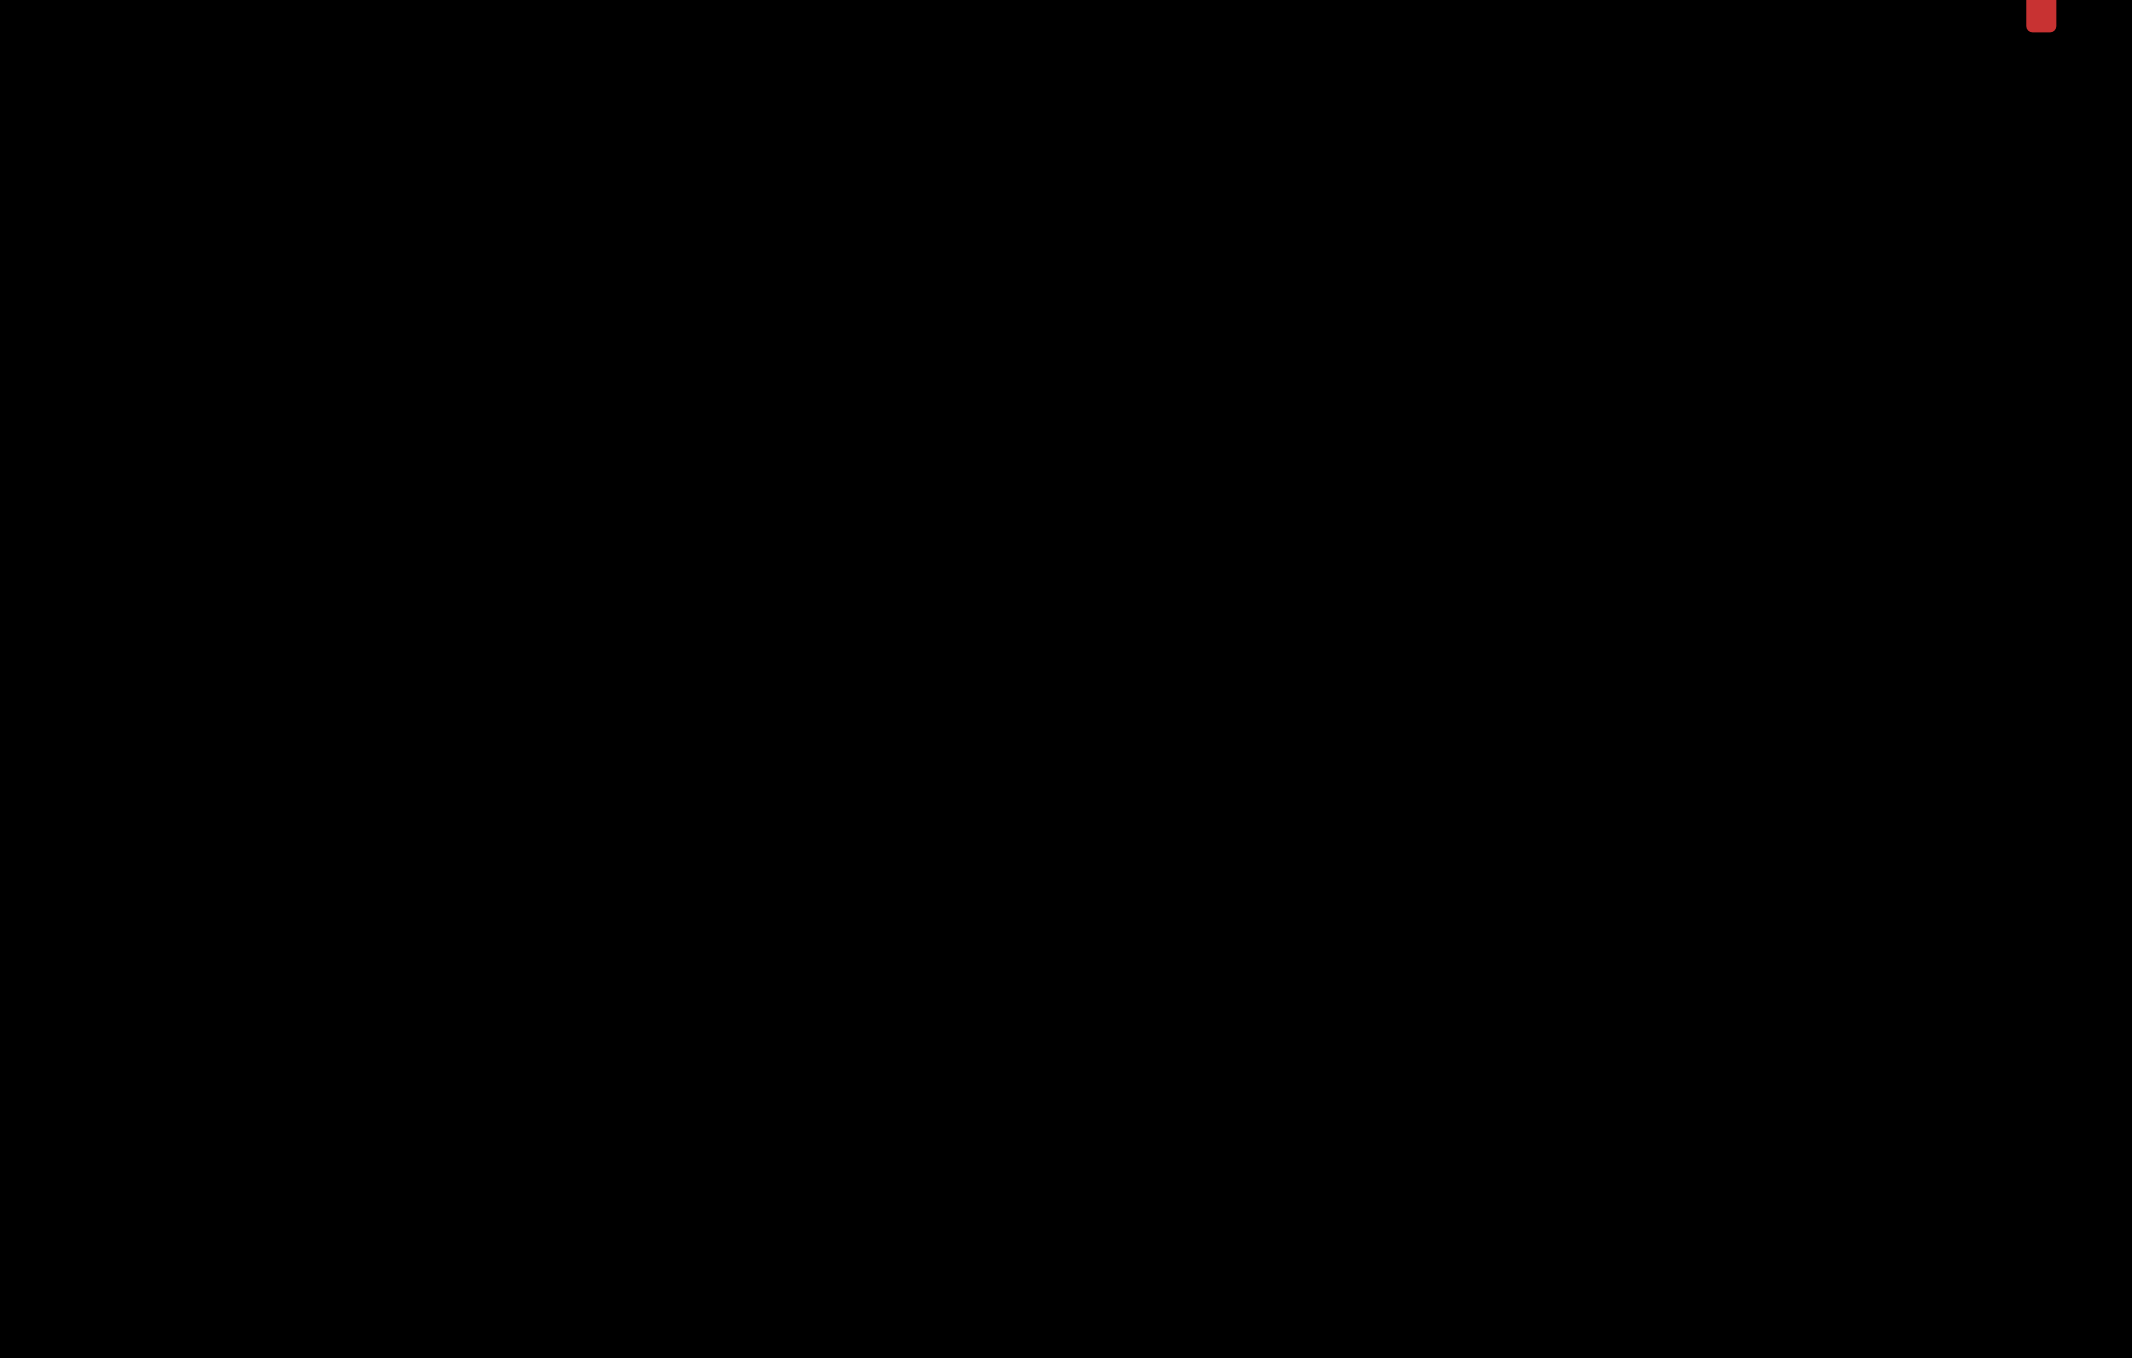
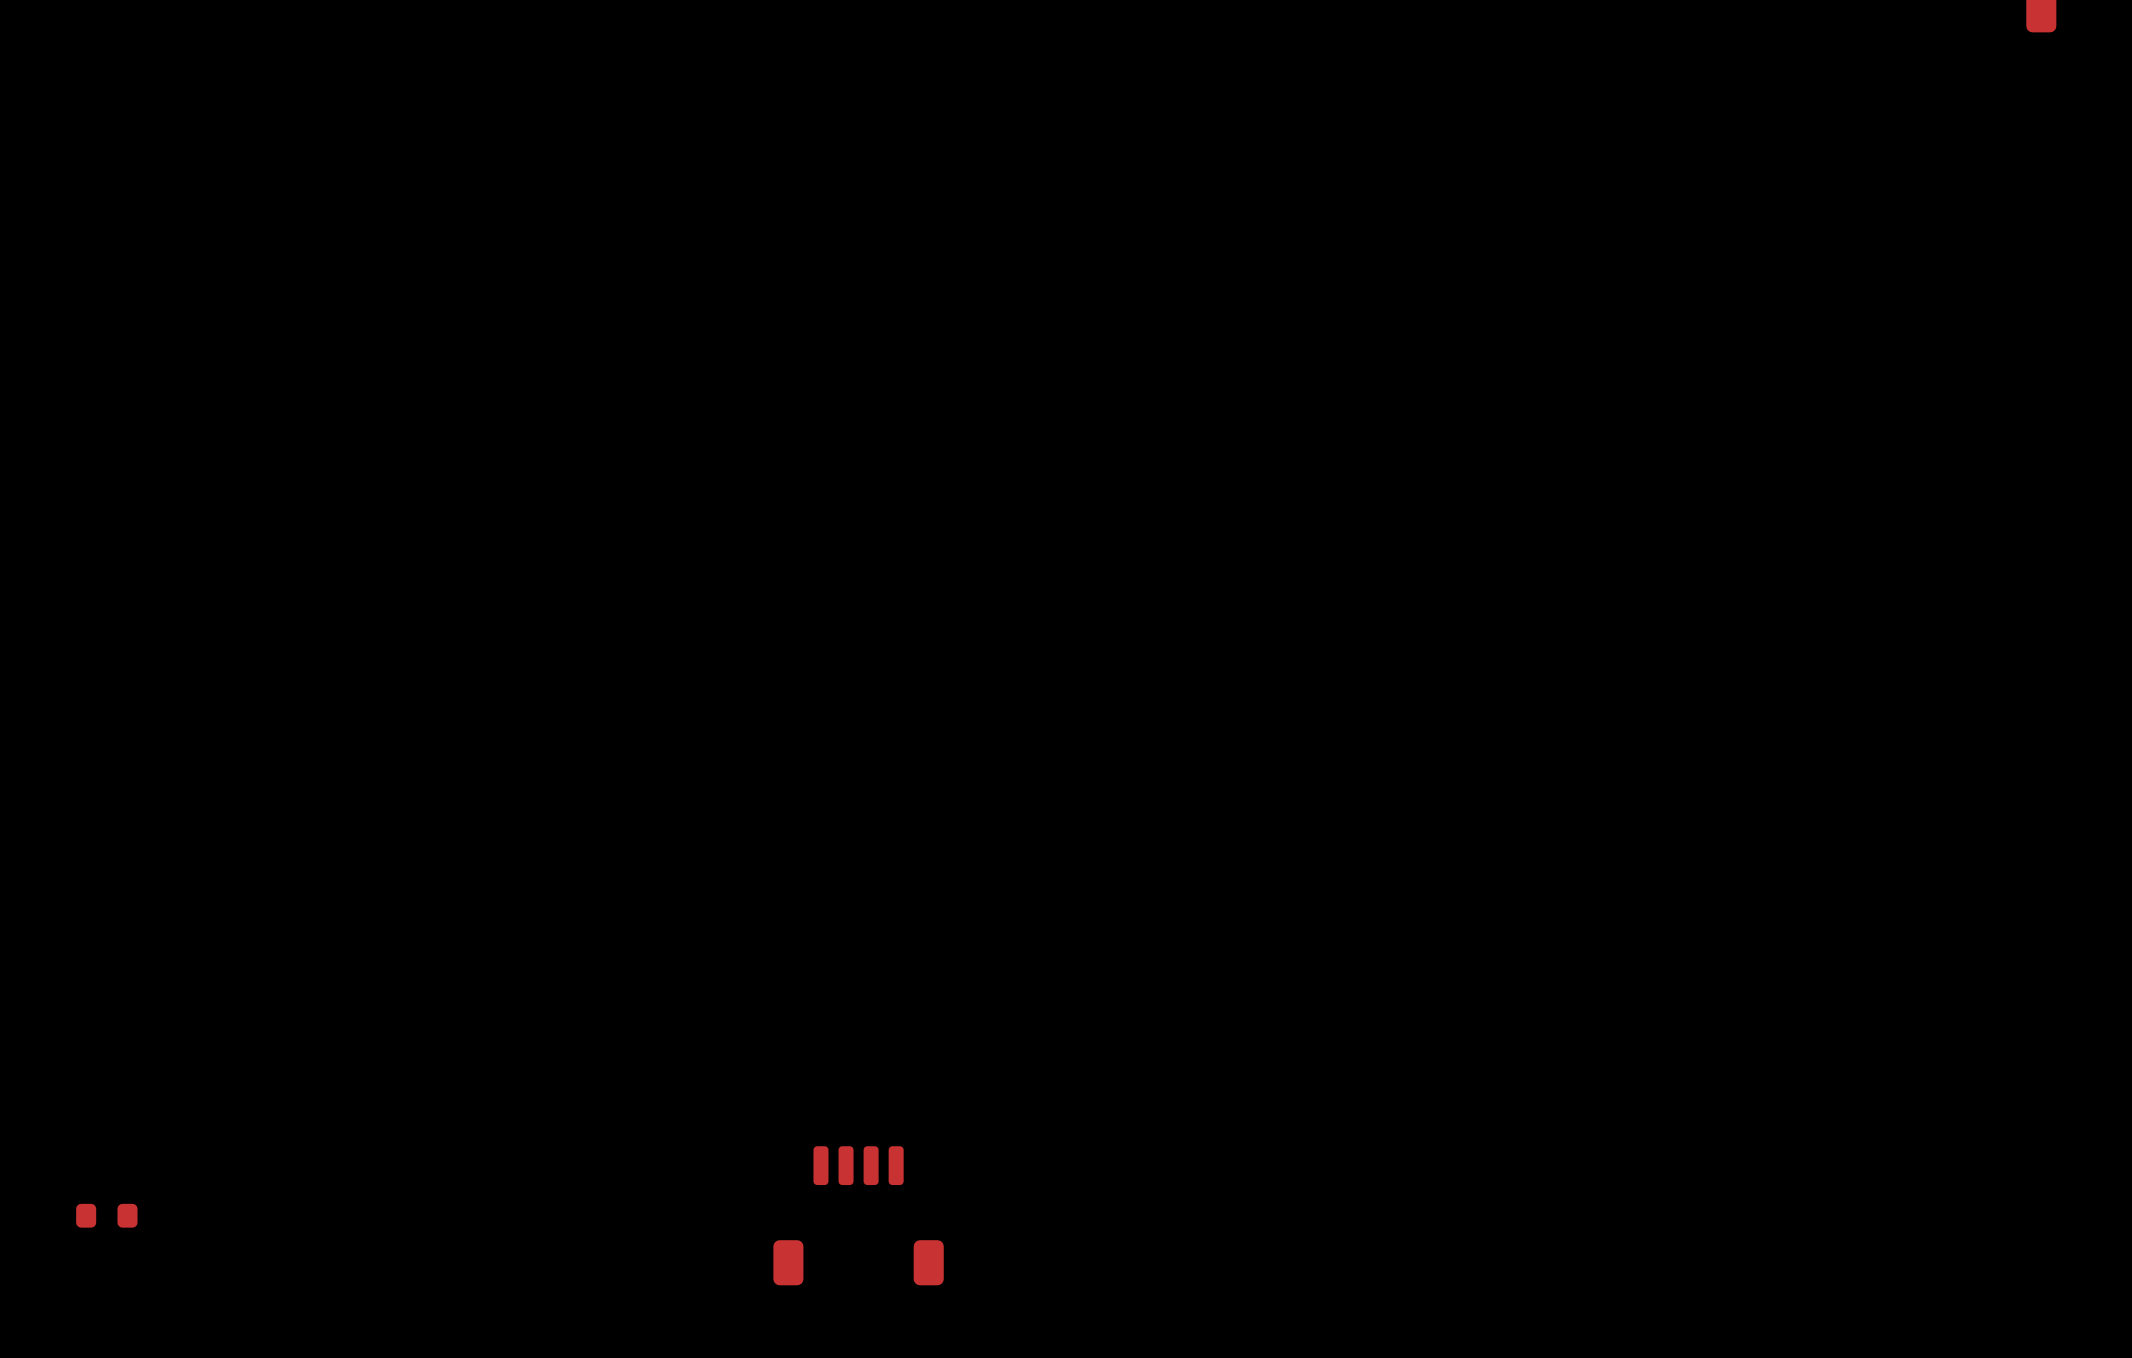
part: none -> (106, 1215)
part: none -> (858, 1215)

